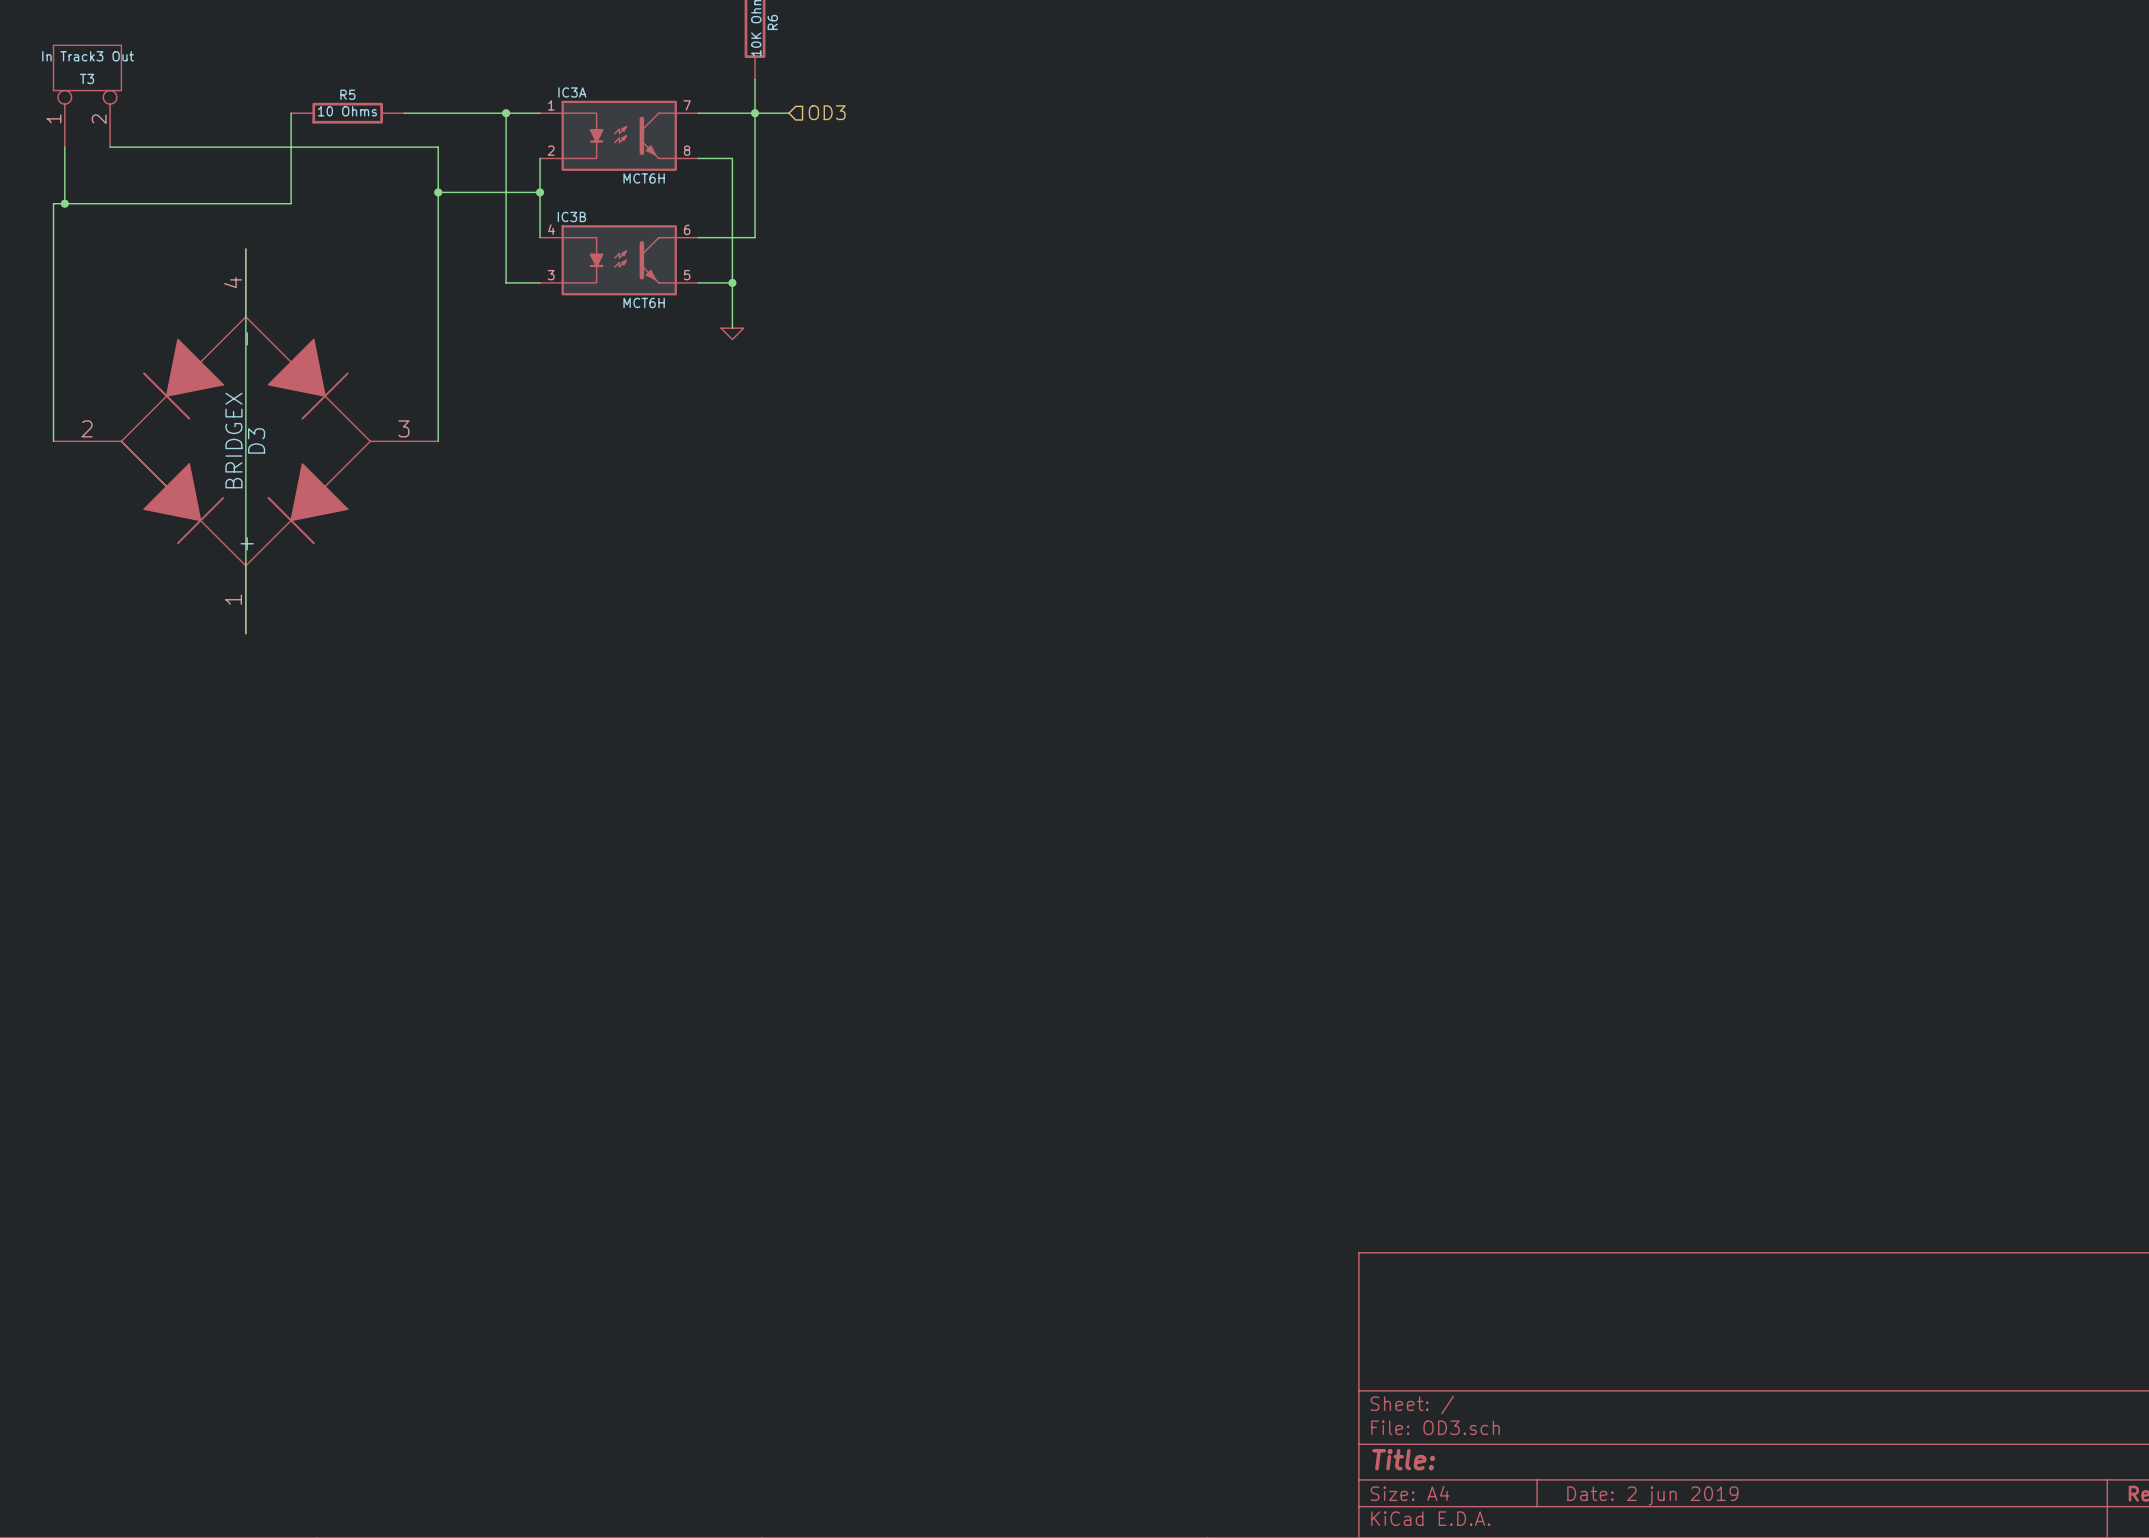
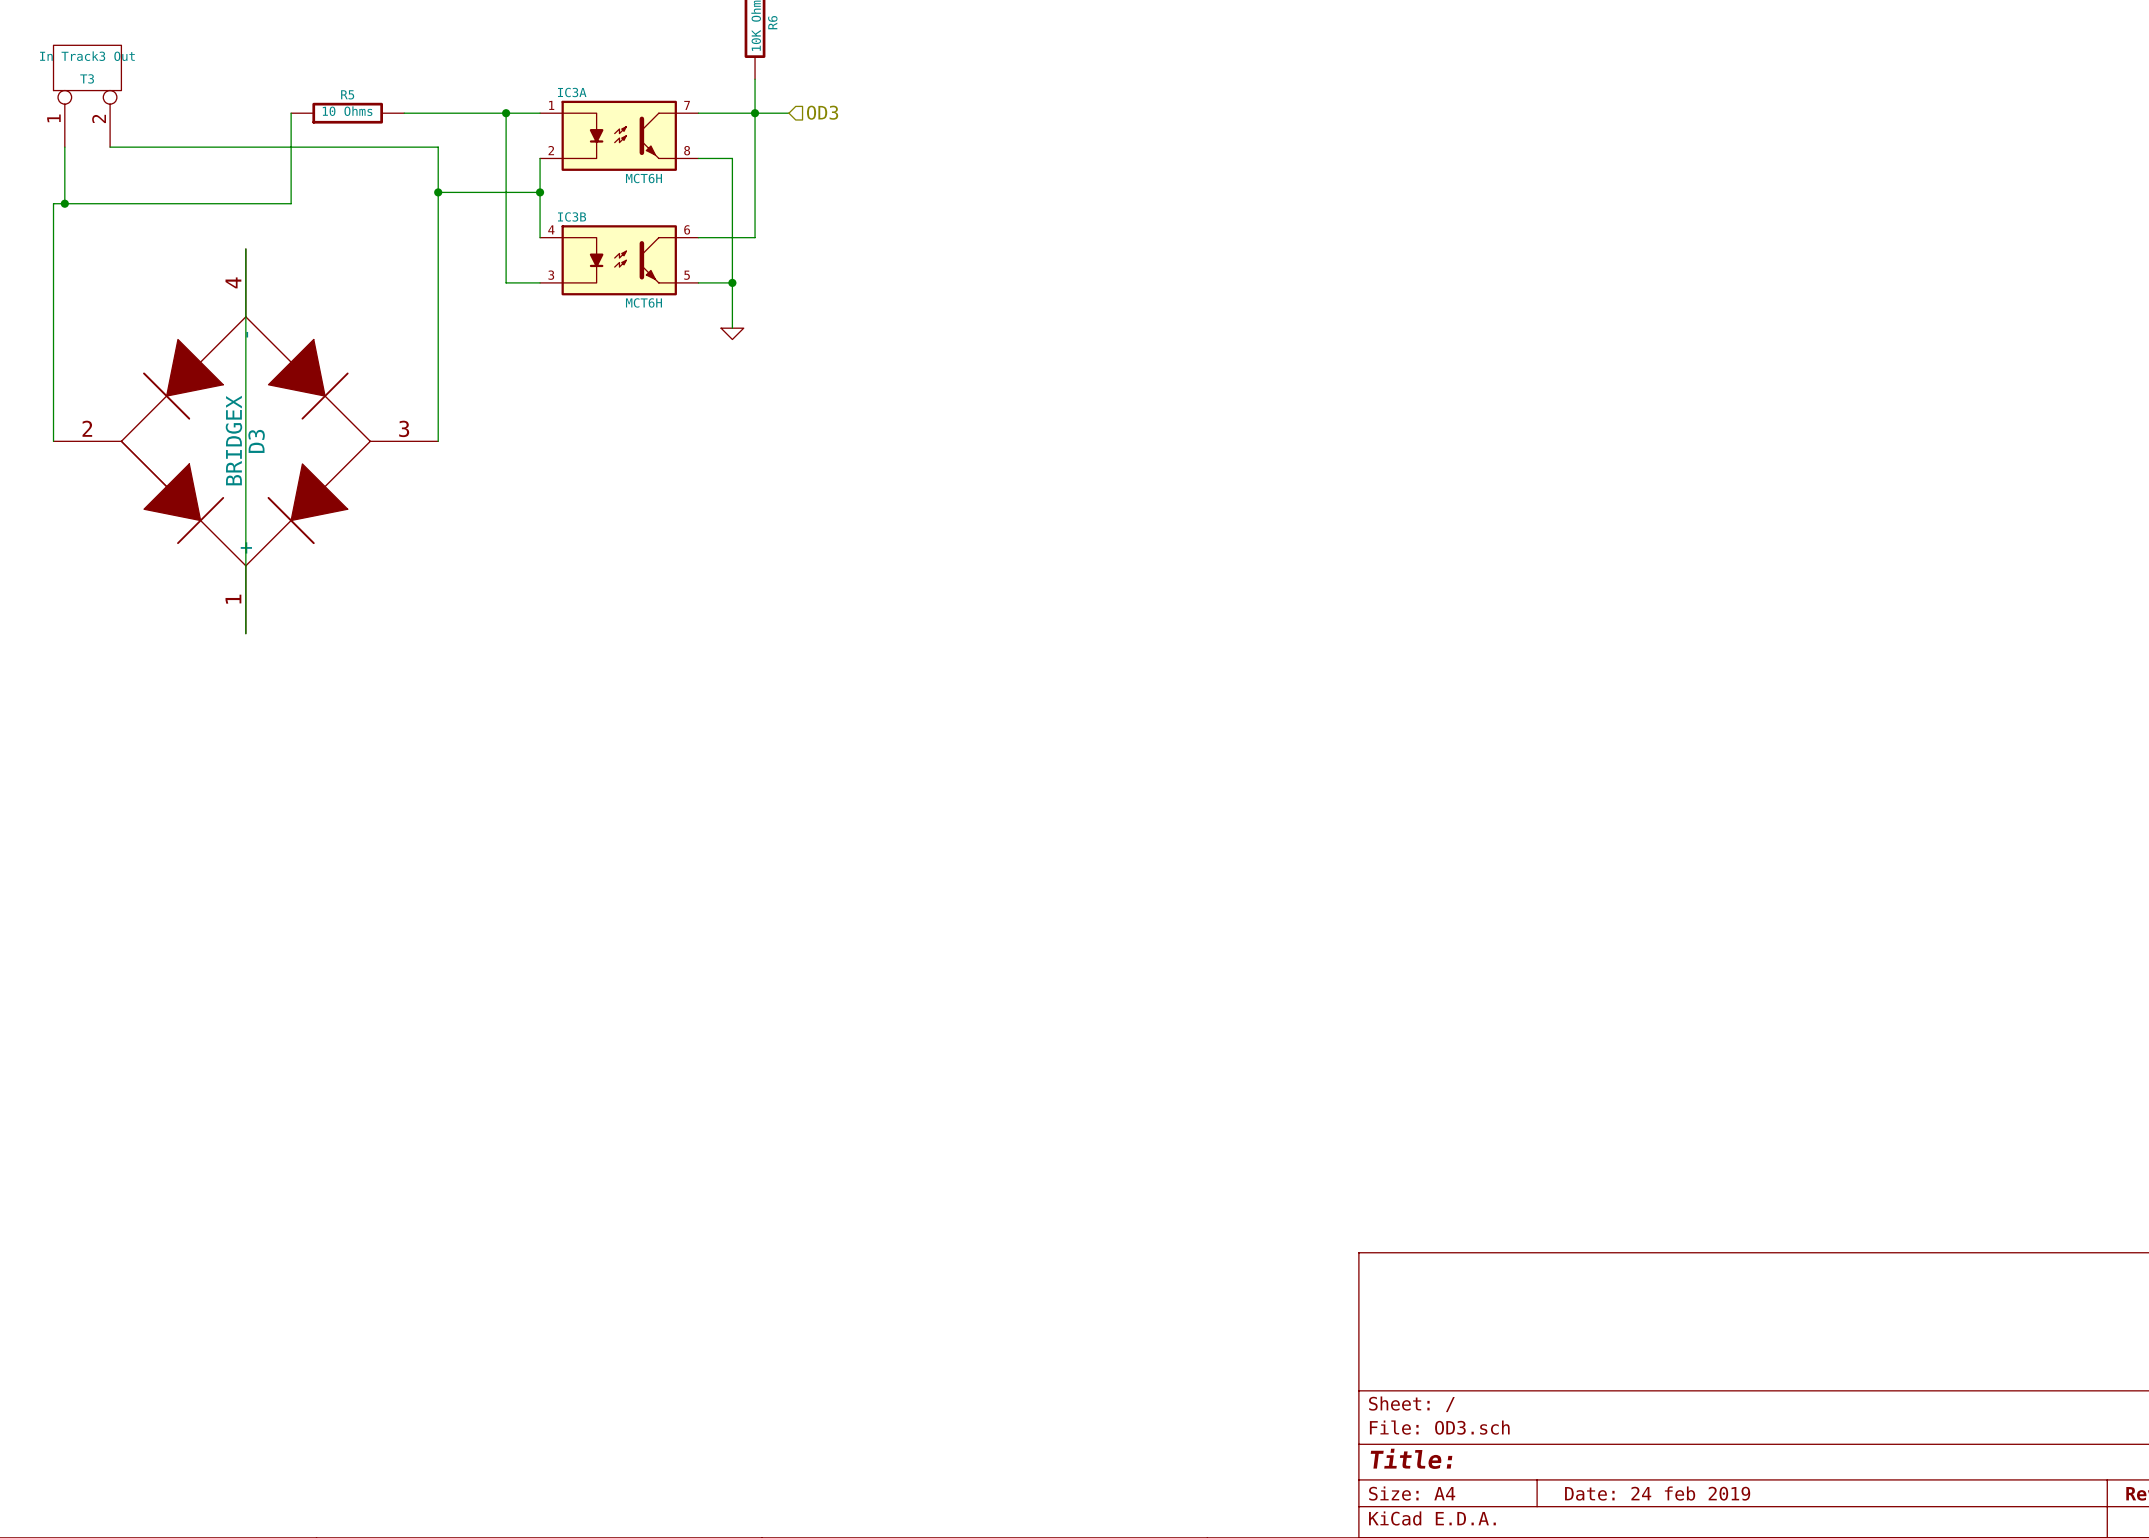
title block: Date: 2 jun 2019 (1652, 1495) -> Date: 24 feb 2019 (1657, 1493)

